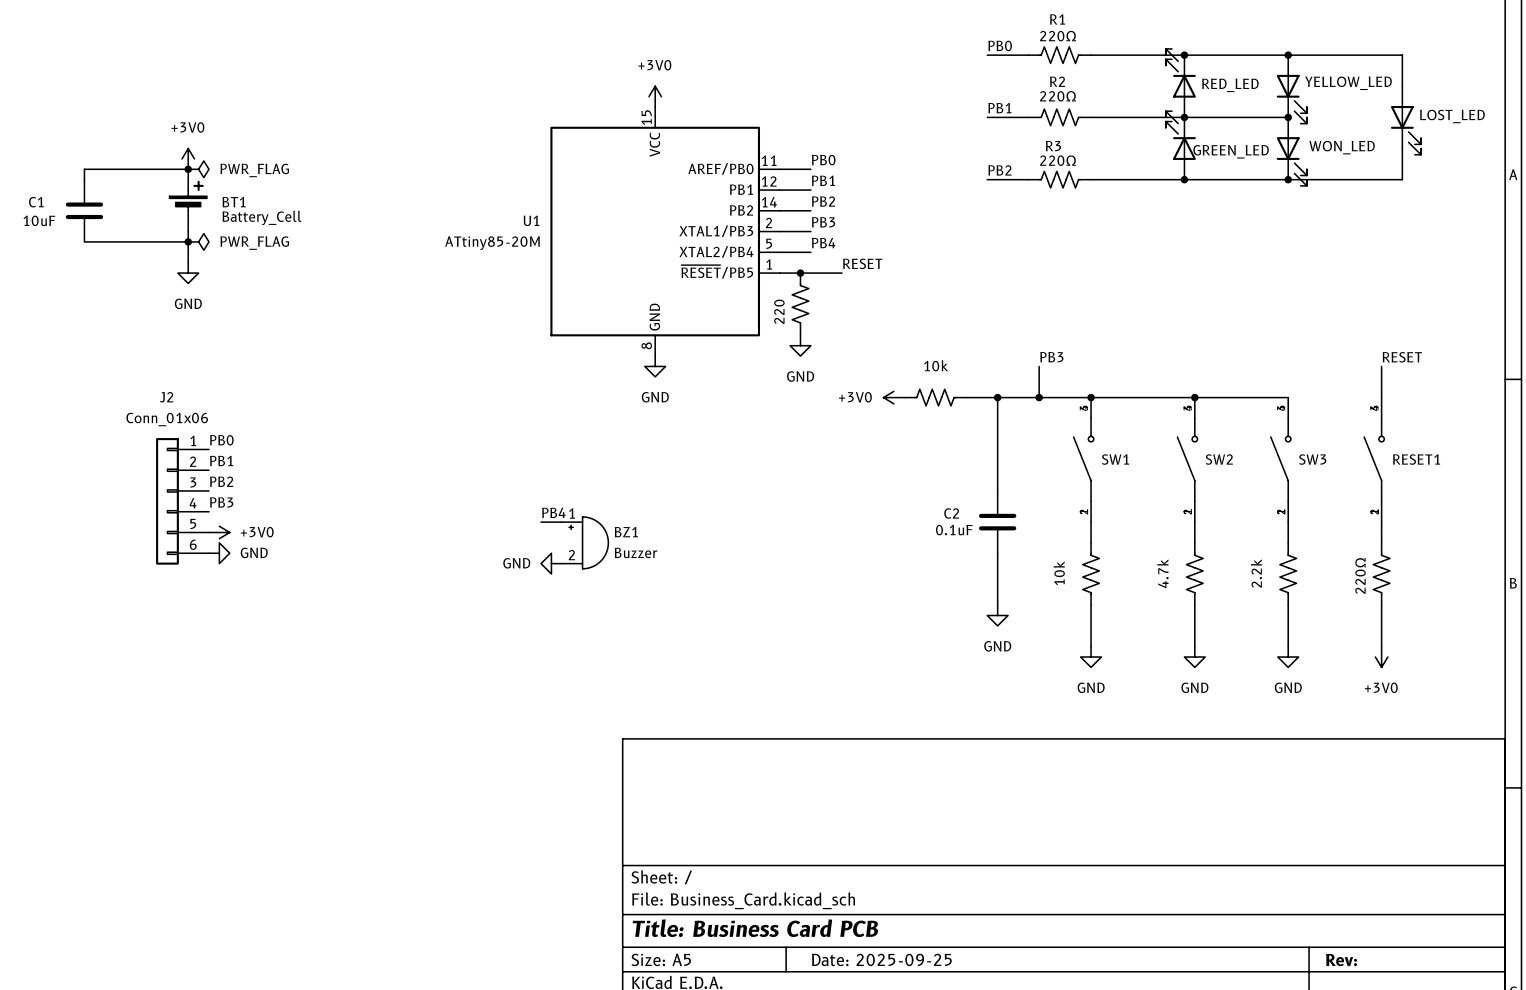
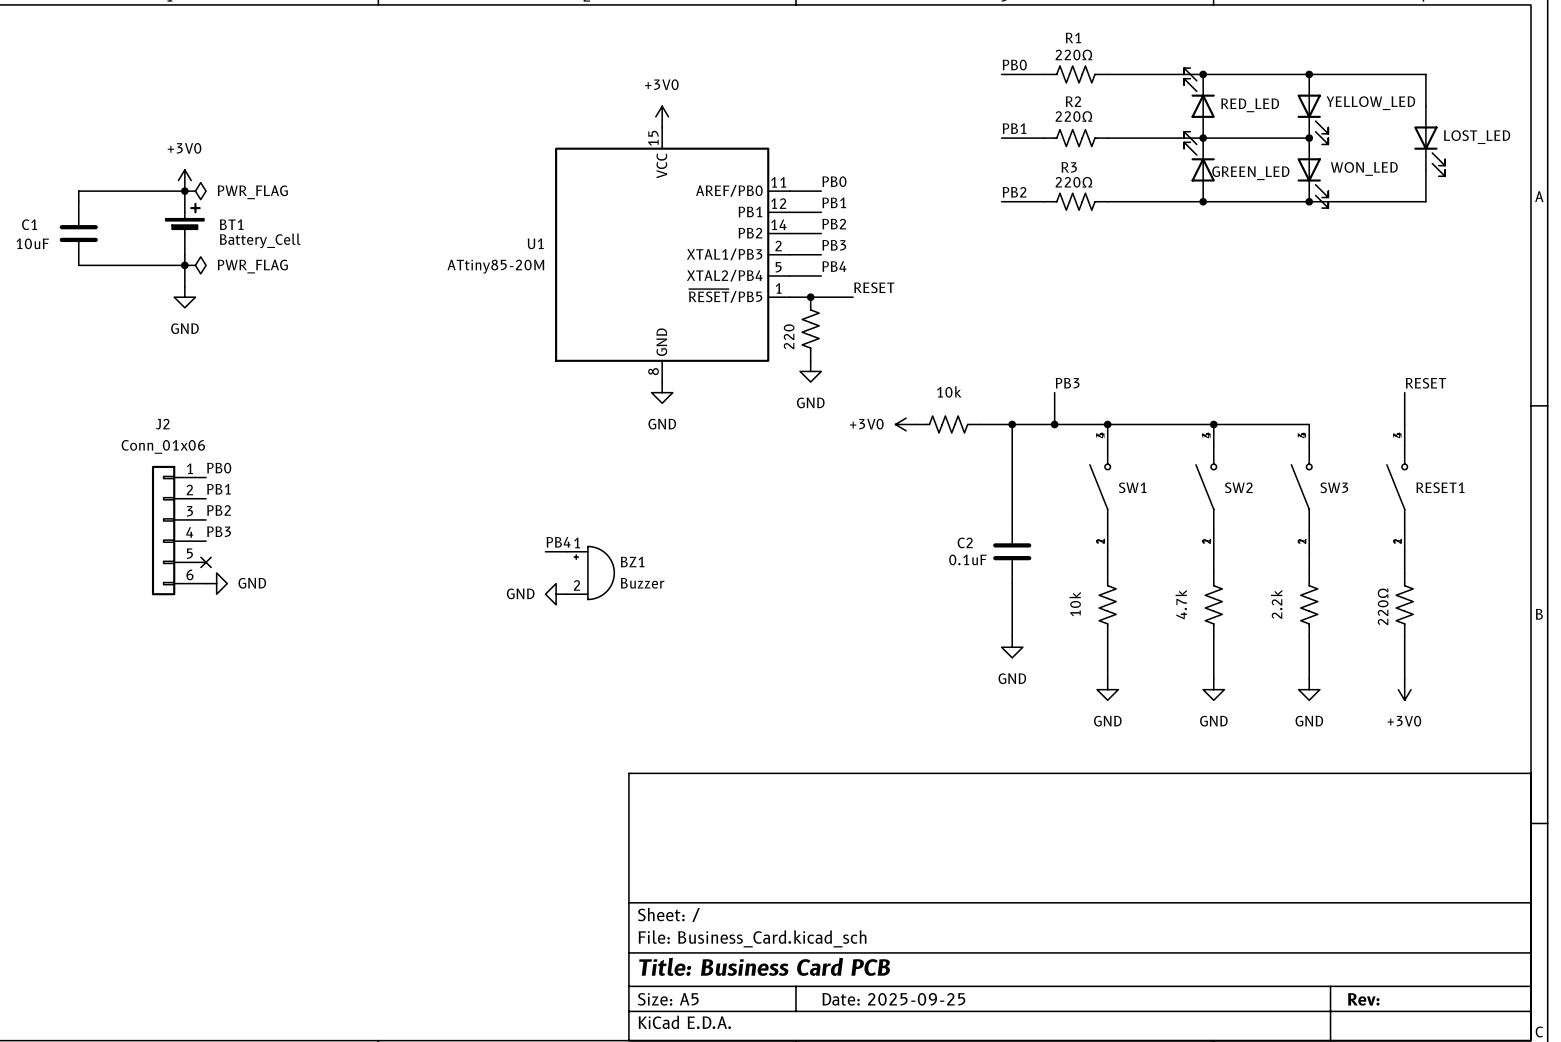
no-connect mark: none -> (206, 562)
power symbol: +3V0 (219, 532) -> none

